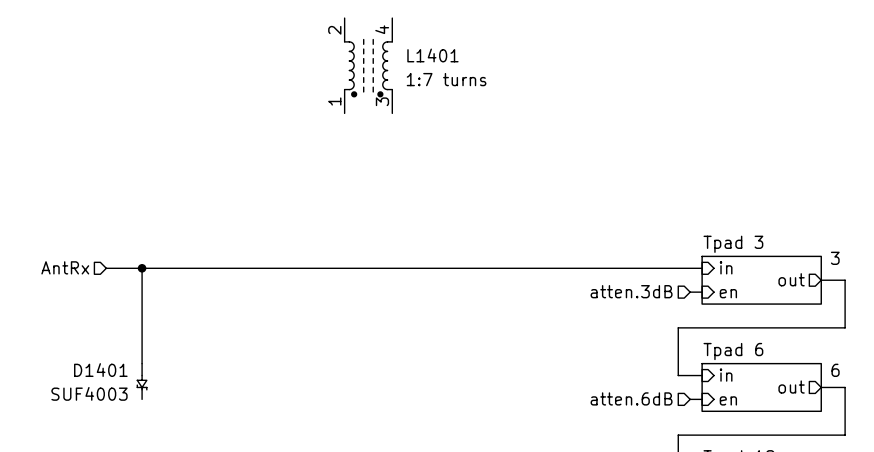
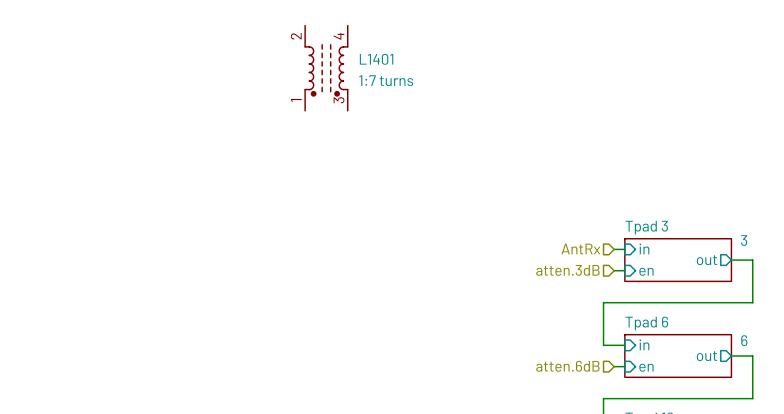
hierarchical label: AntRx (65, 267) -> none
hierarchical label: none -> AntRx (580, 249)
wire: (106, 268) (690, 268) -> none
wire: (142, 268) (142, 363) -> none
junction: (142, 268) -> none
D1401: SUF4003 (142, 381) -> none

